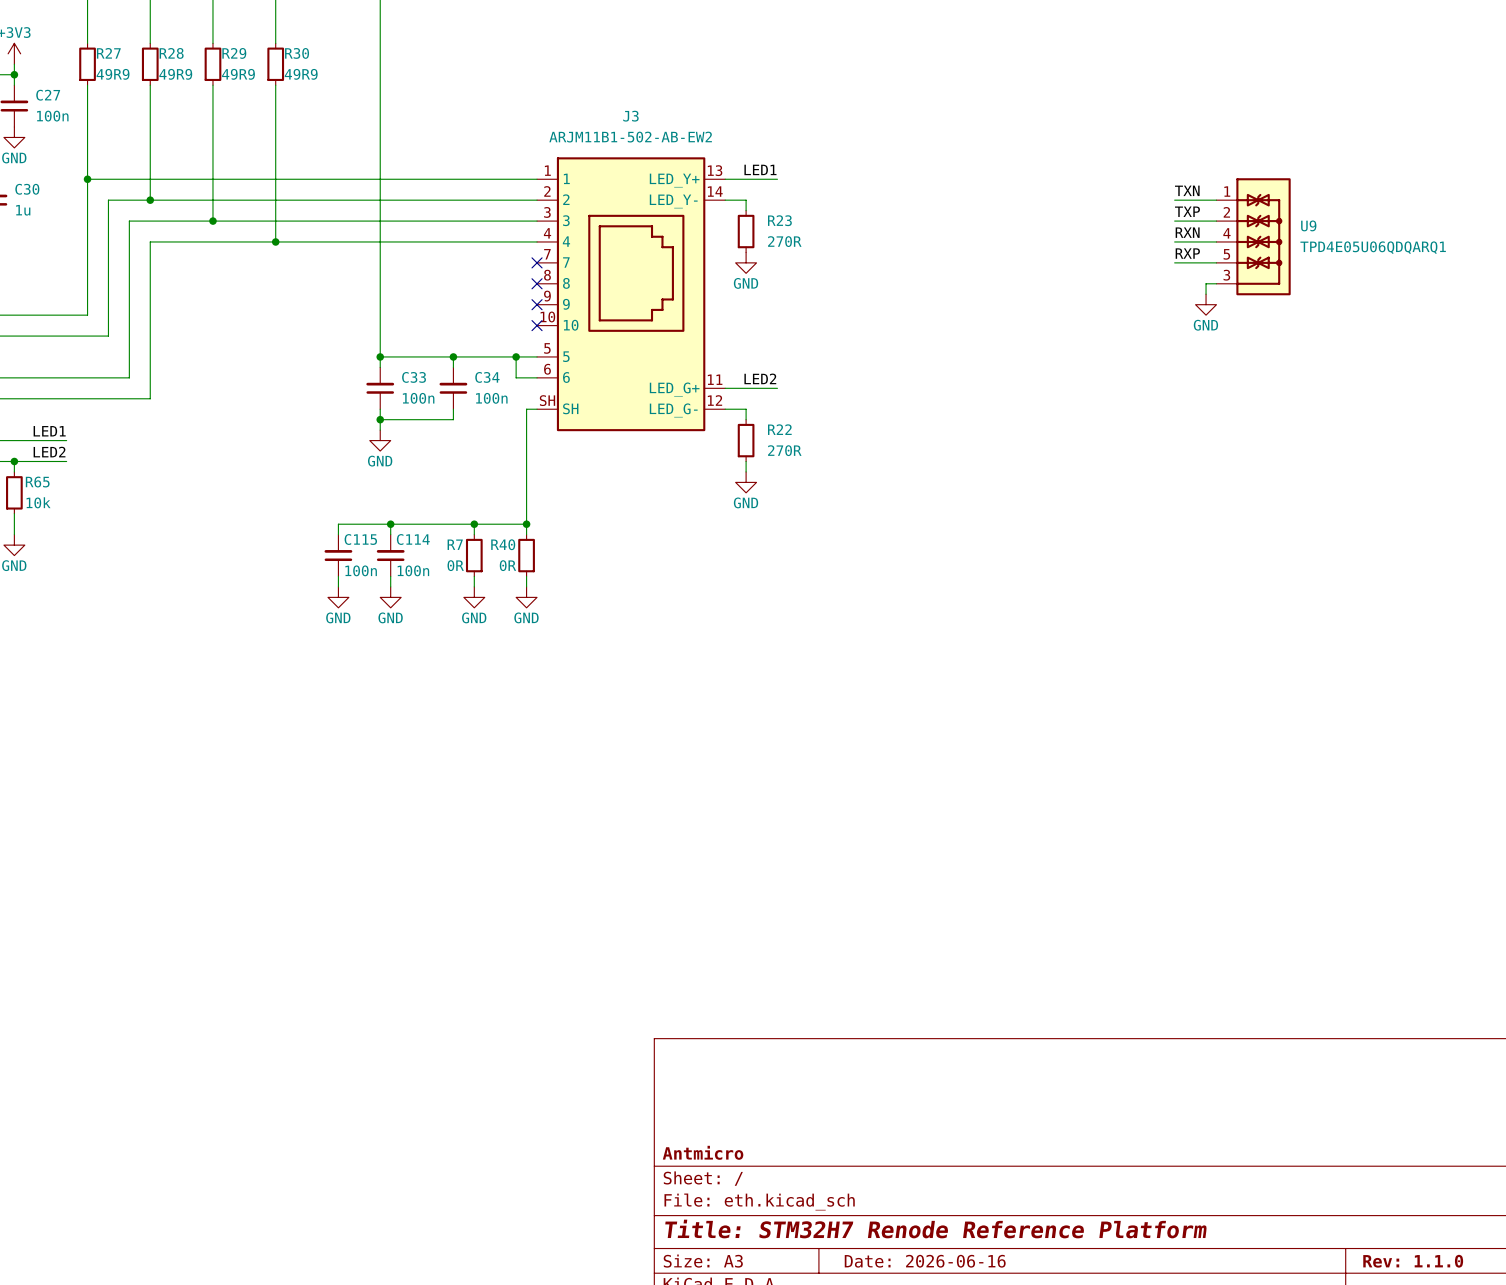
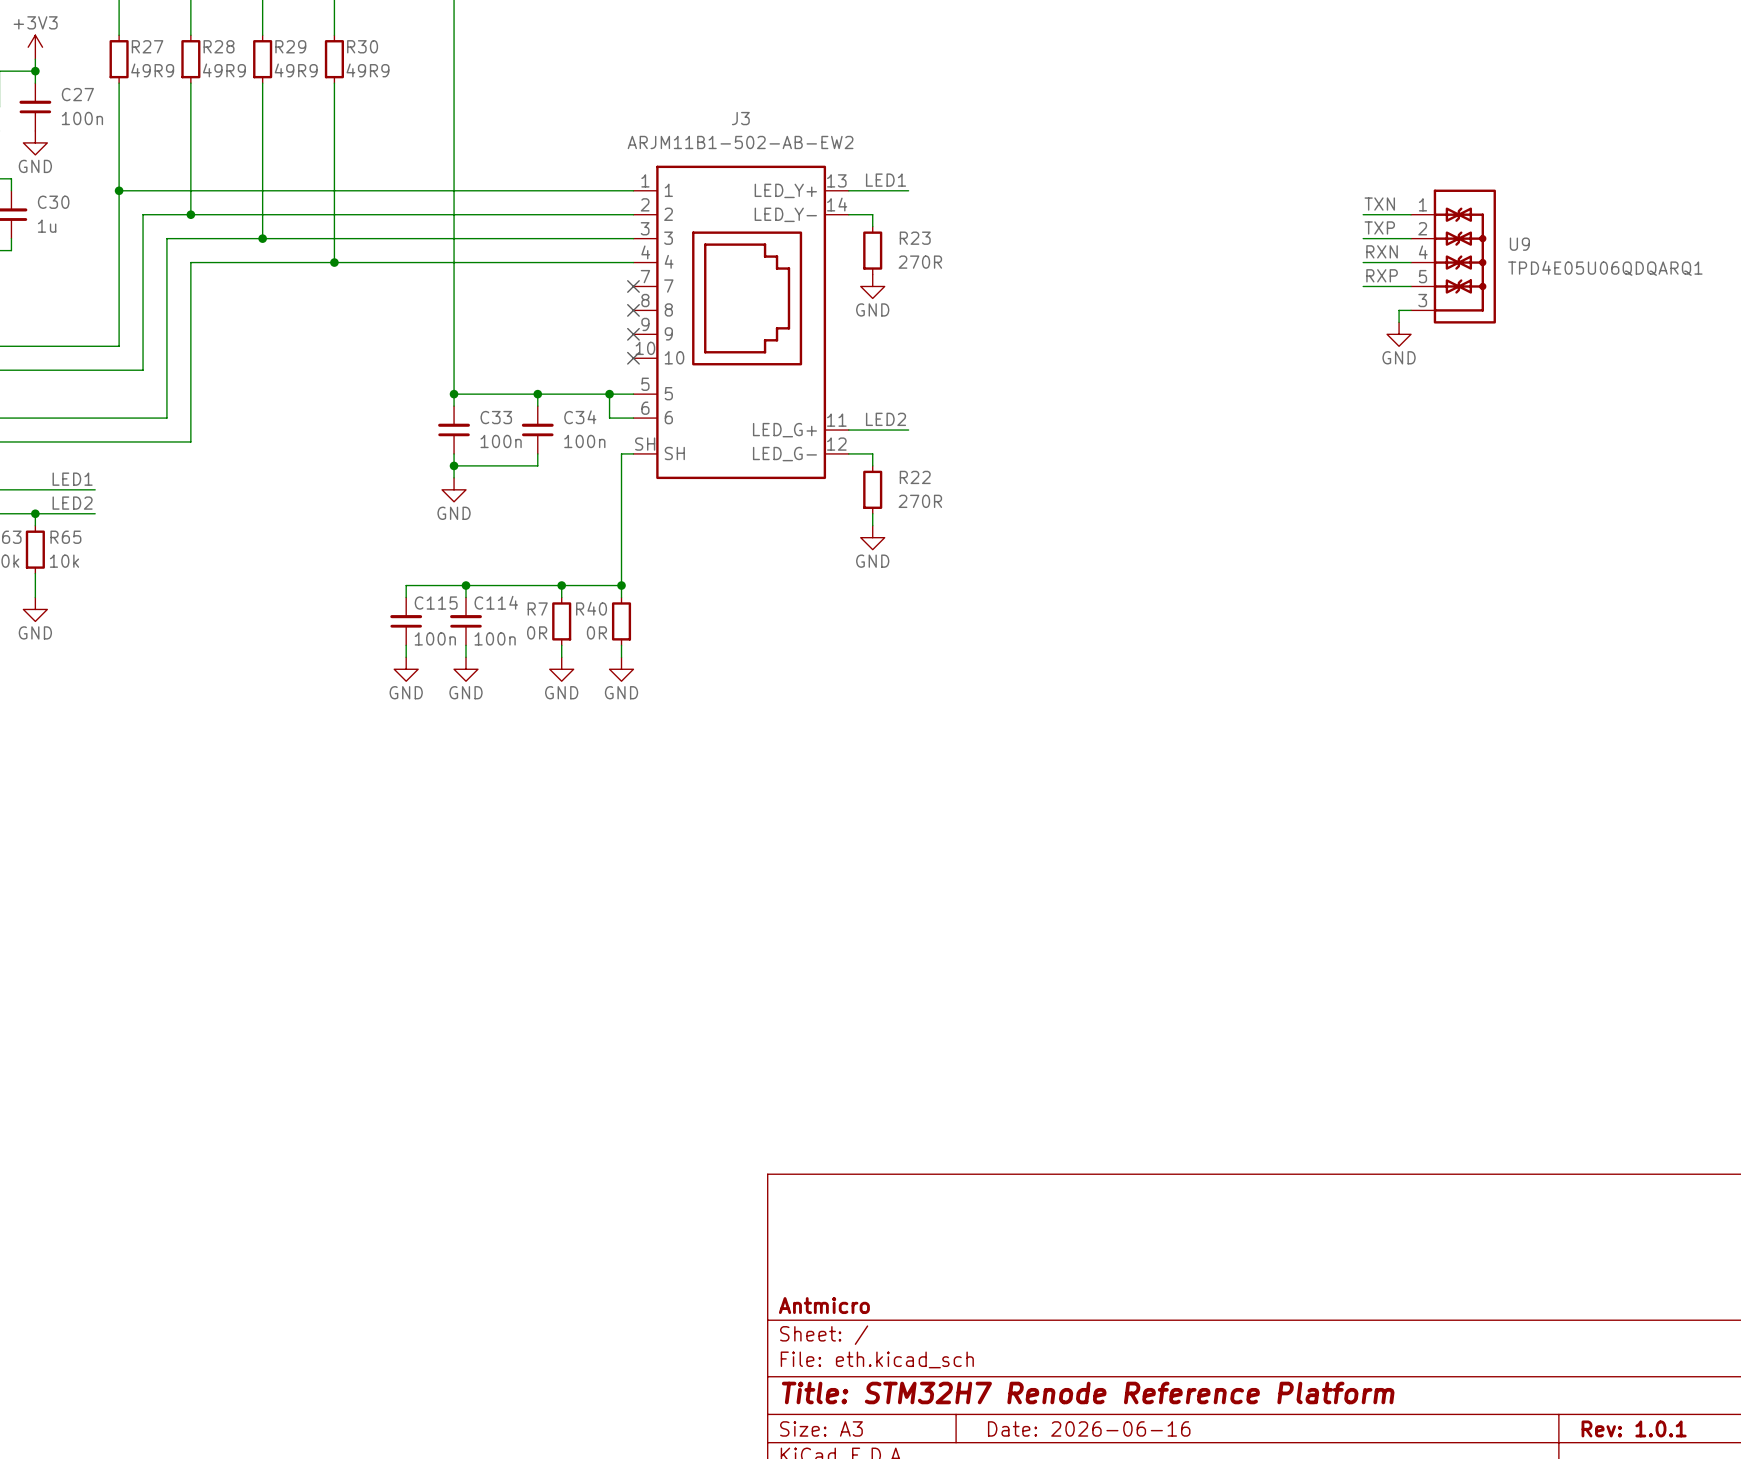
title block: Rev: 1.1.0 (1413, 1261) -> Rev: 1.0.1 (1634, 1428)

